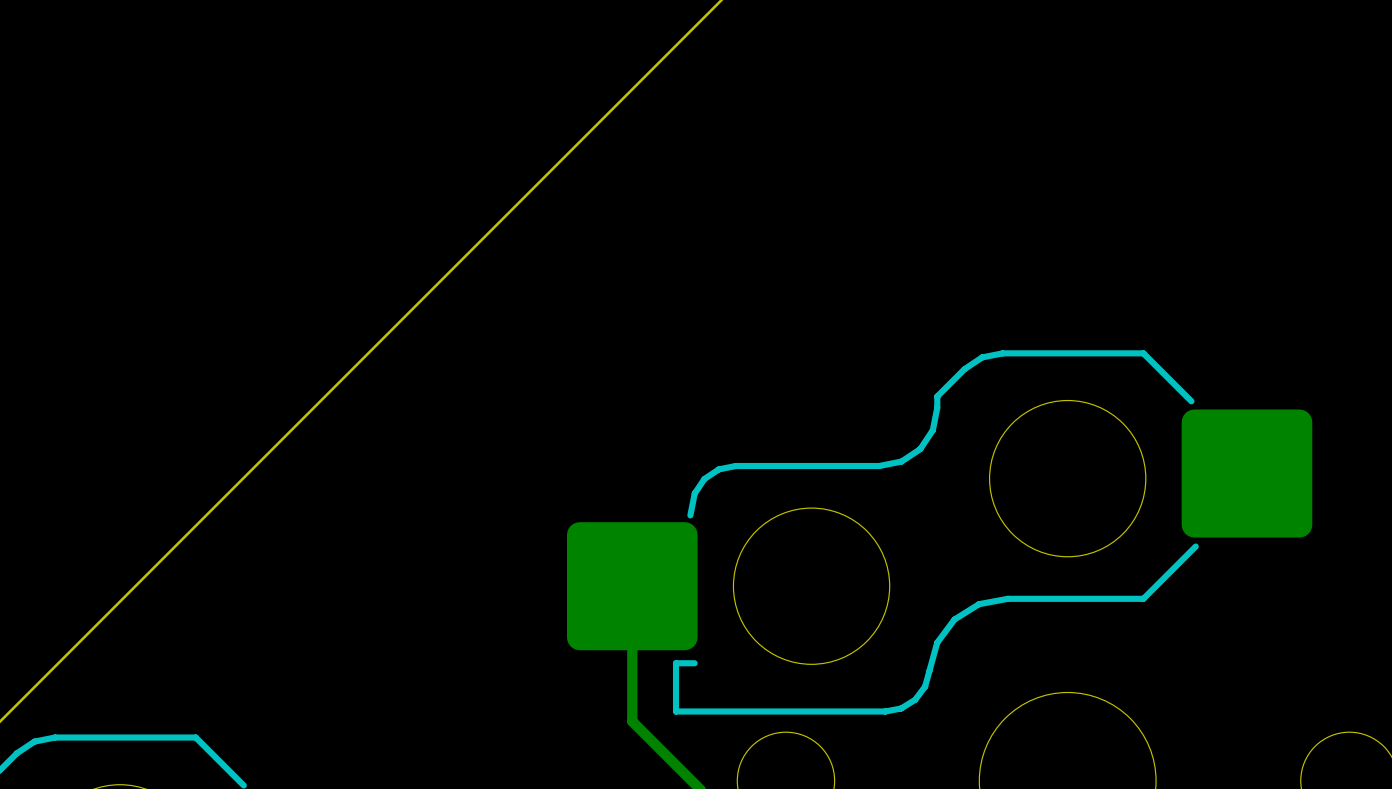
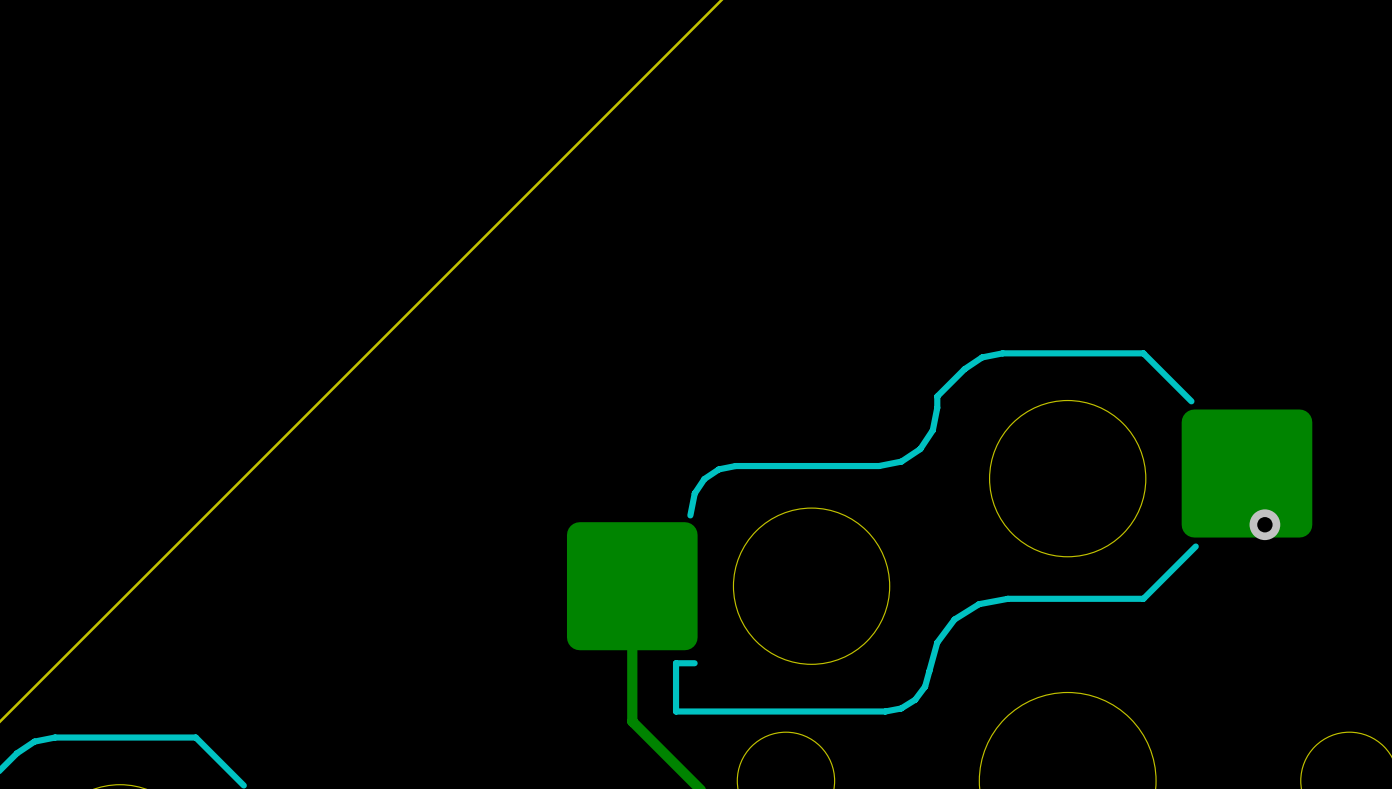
via: none -> (1264, 524)

